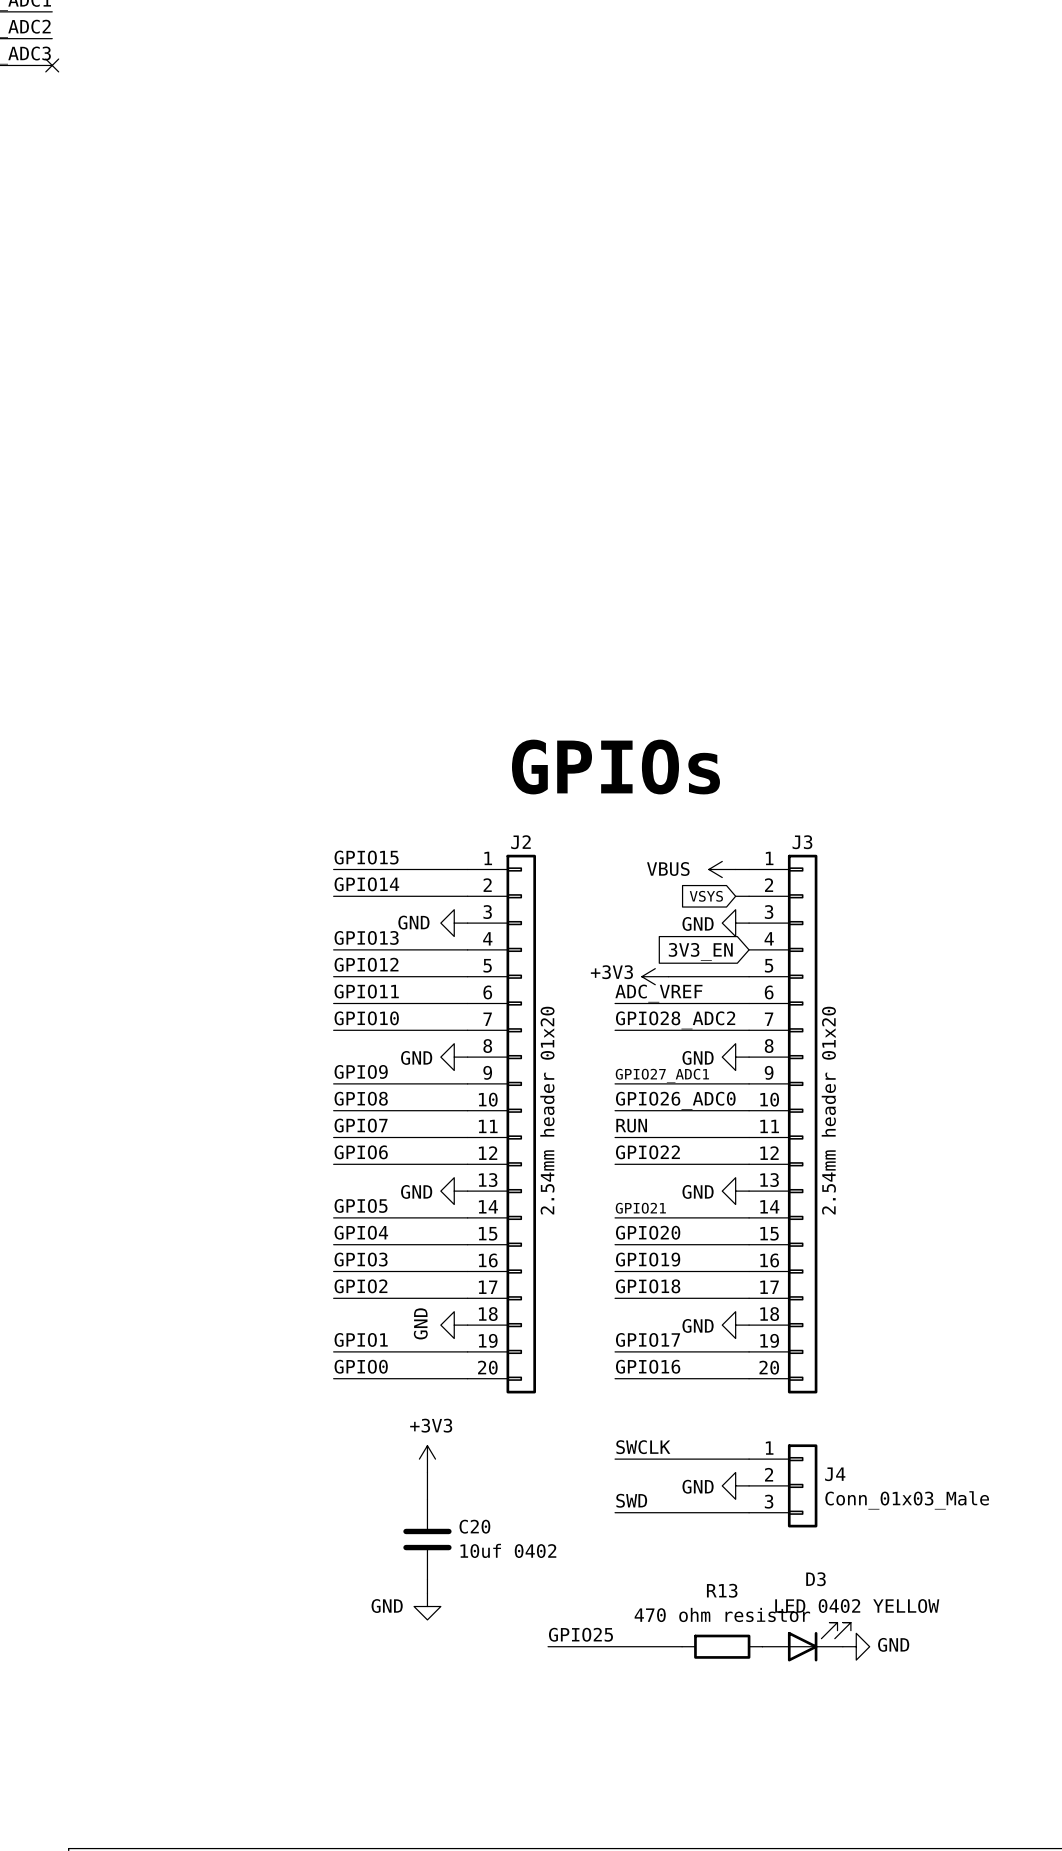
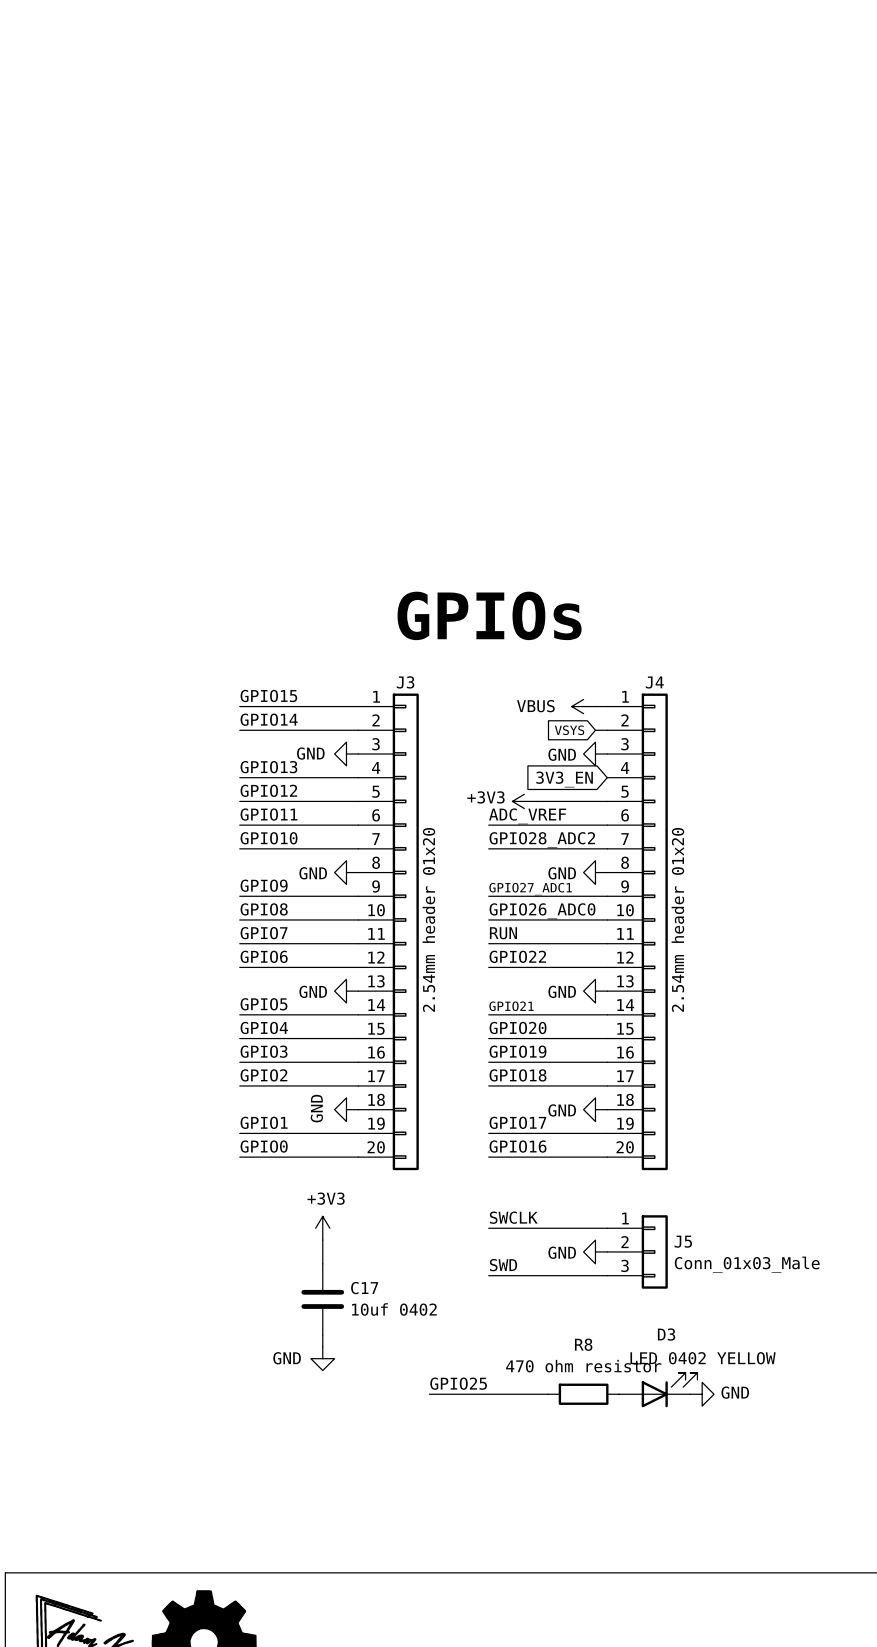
J2 name: J2 (520, 842) -> J3 (405, 682)
J3 name: J3 (802, 842) -> J4 (654, 682)
J4 name: J4 (835, 1474) -> J5 (683, 1241)
C20 name: C20 (474, 1526) -> C17 (364, 1288)
R13 name: R13 (722, 1590) -> R8 (583, 1344)

